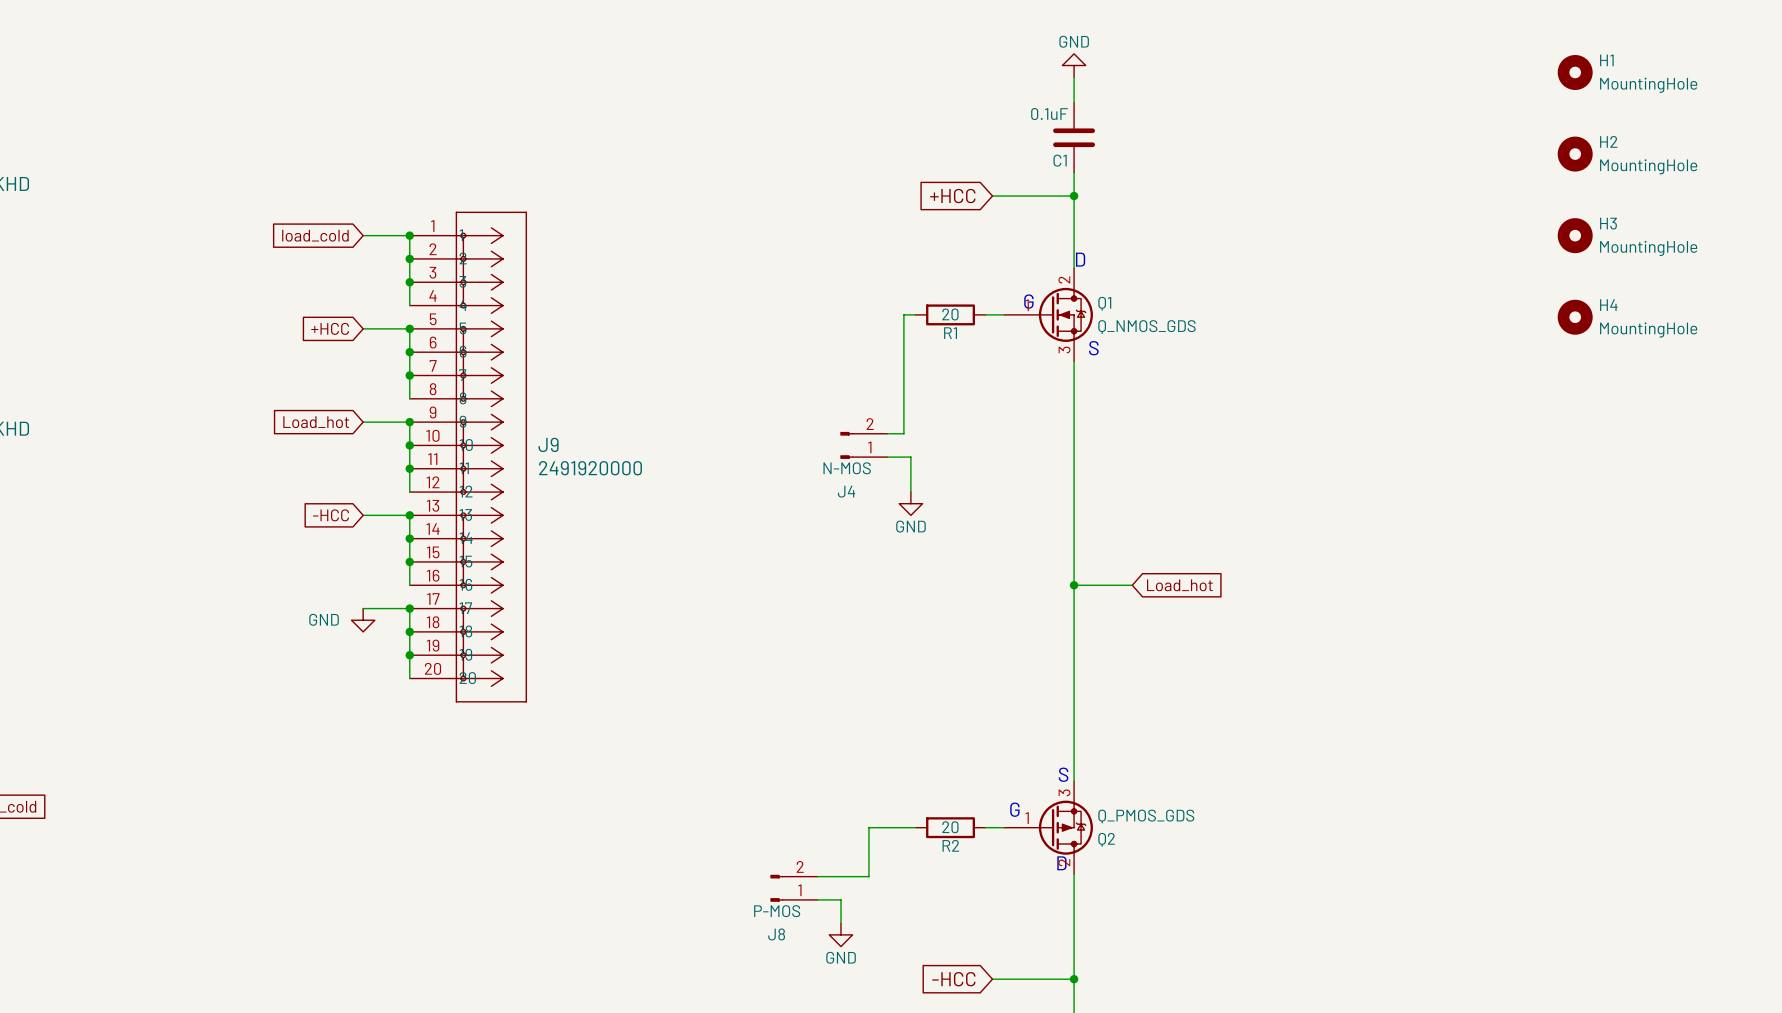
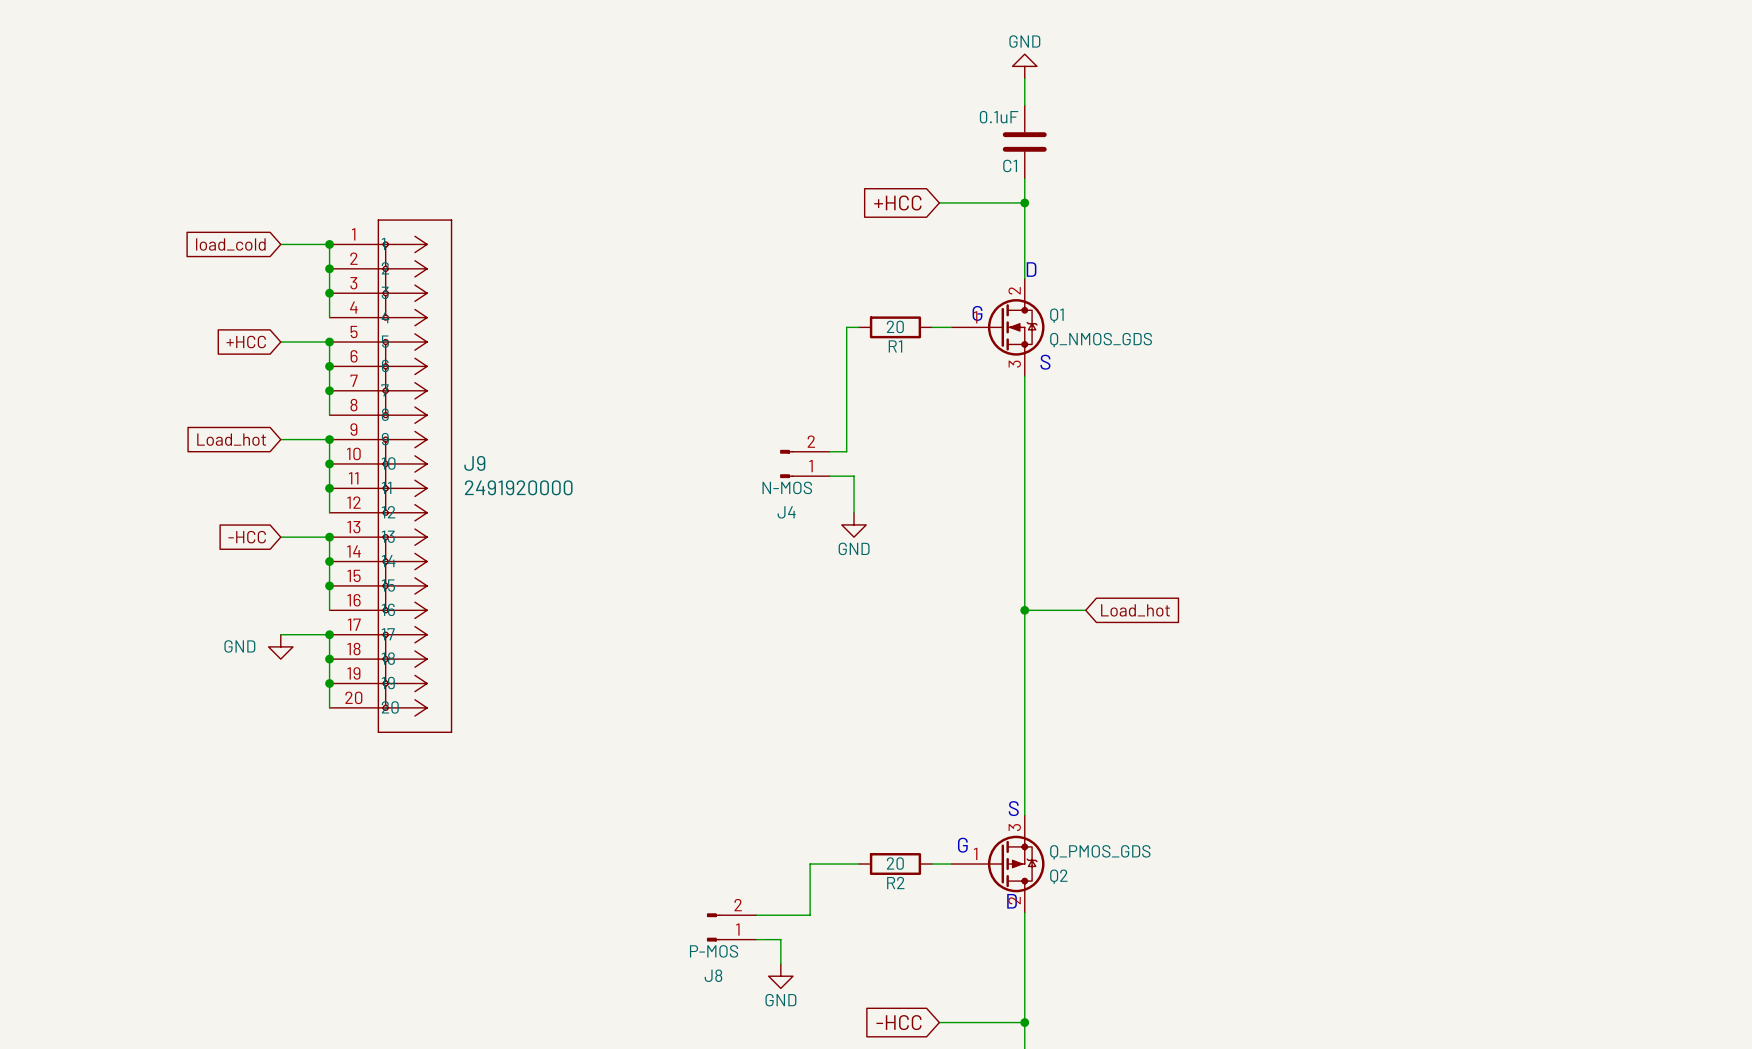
H1: MountingHole (1575, 72) -> none
H2: MountingHole (1575, 154) -> none
H3: MountingHole (1575, 235) -> none
H4: MountingHole (1575, 317) -> none

